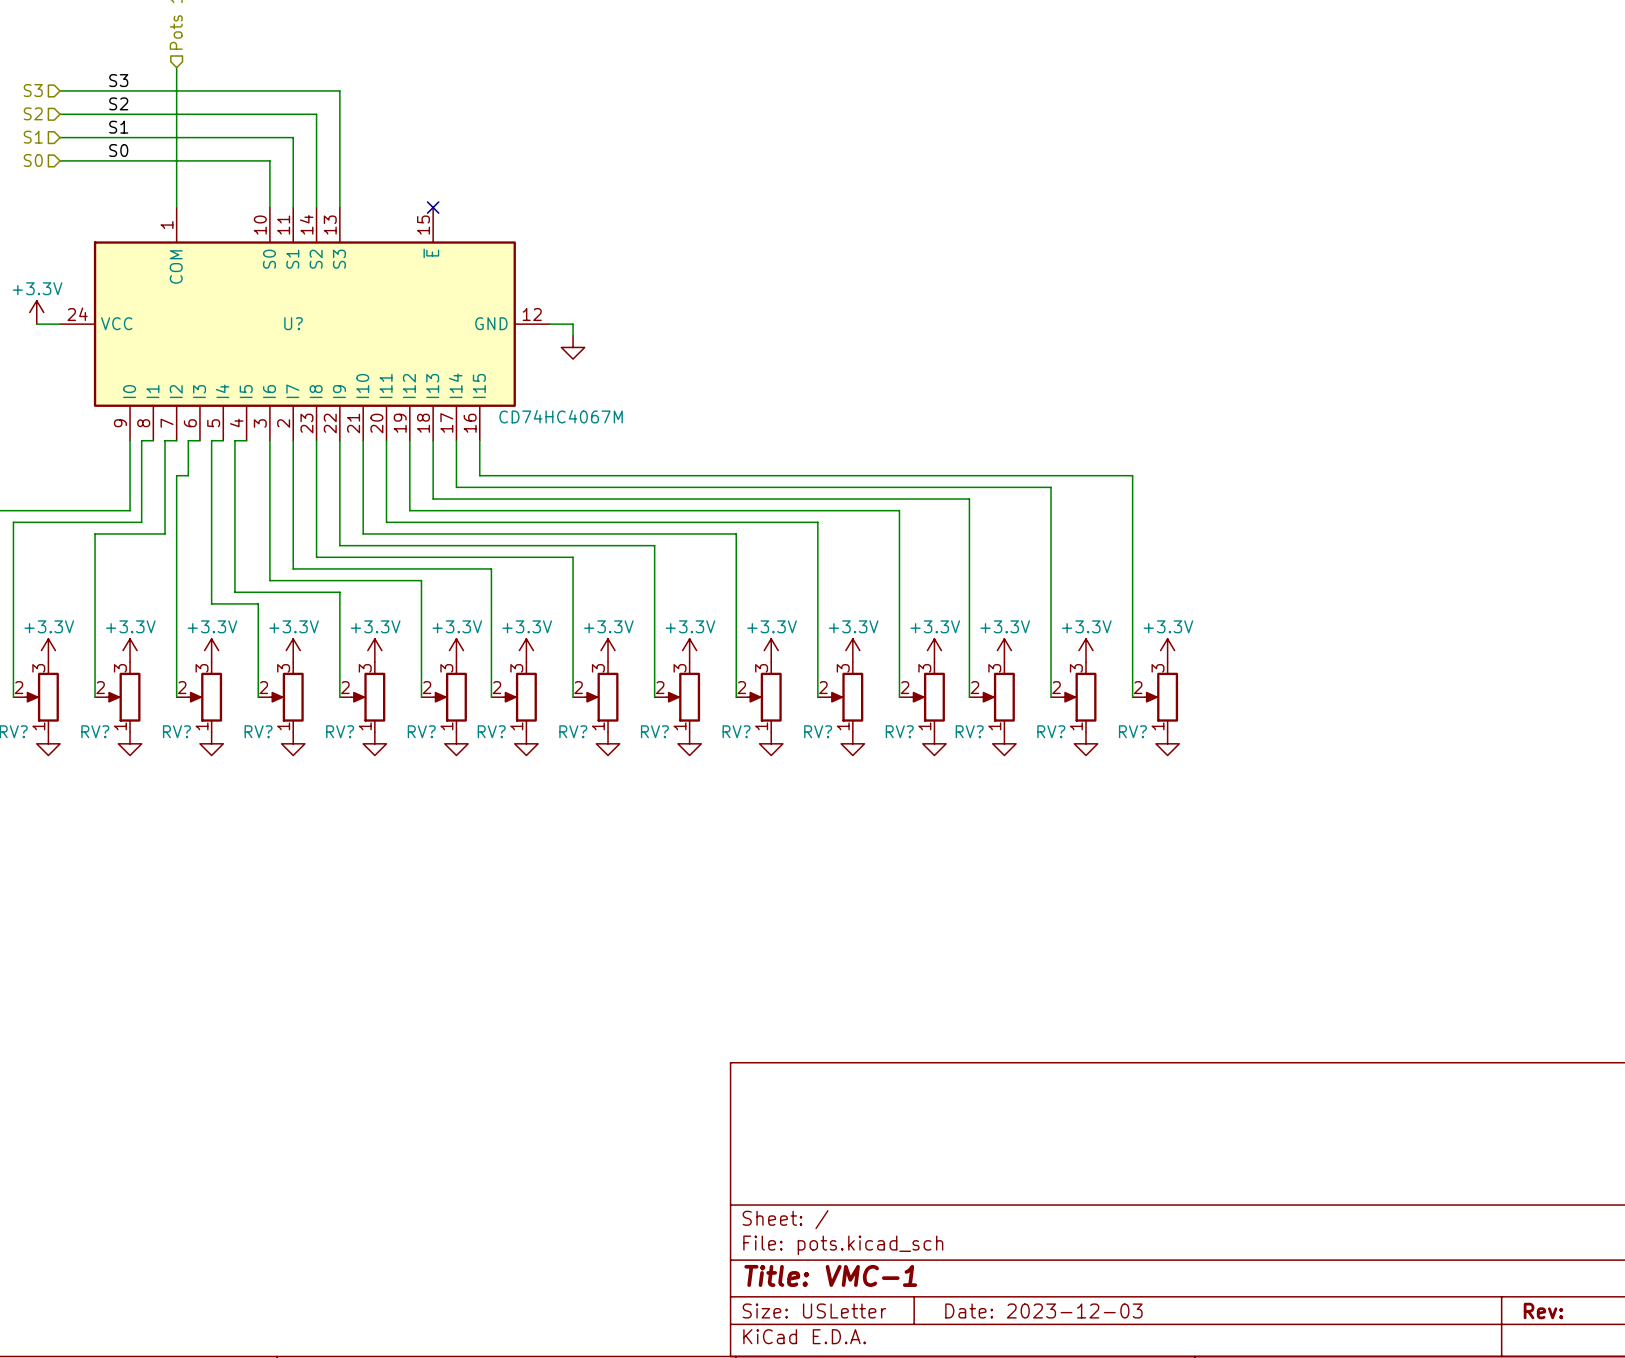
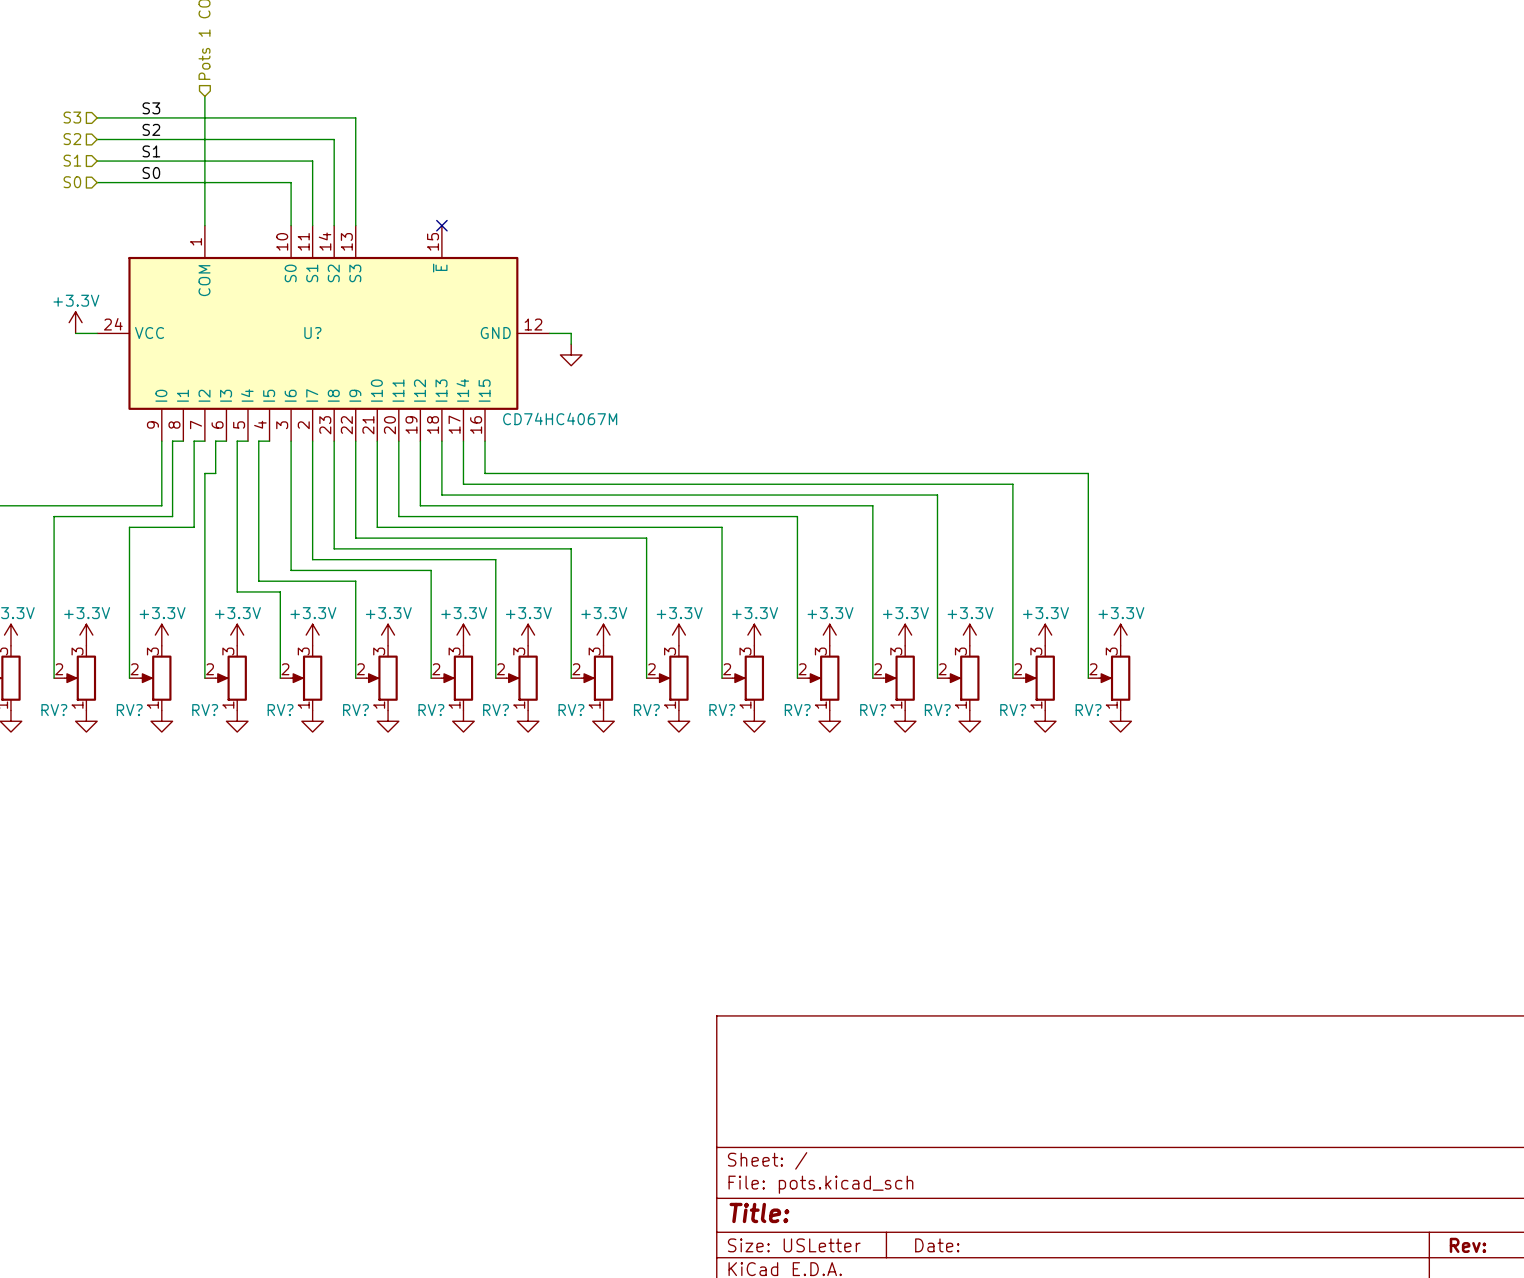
title block: Title: VMC-1 (830, 1275) -> Title: (759, 1212)
title block: Date: 2023-12-03 (1043, 1310) -> Date: (937, 1245)

